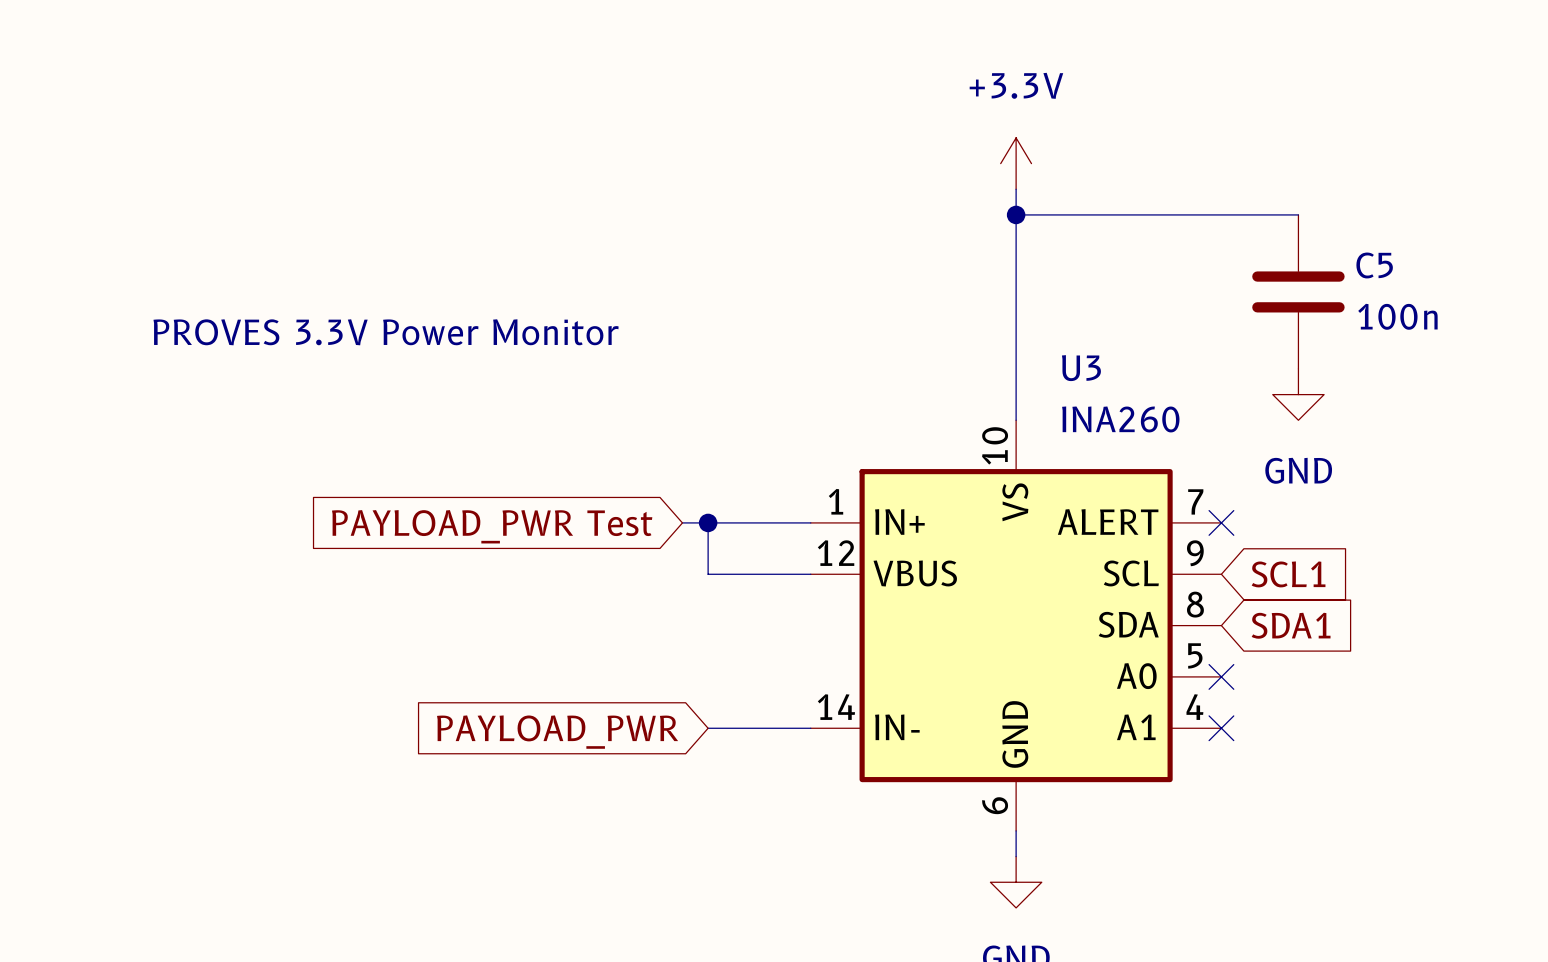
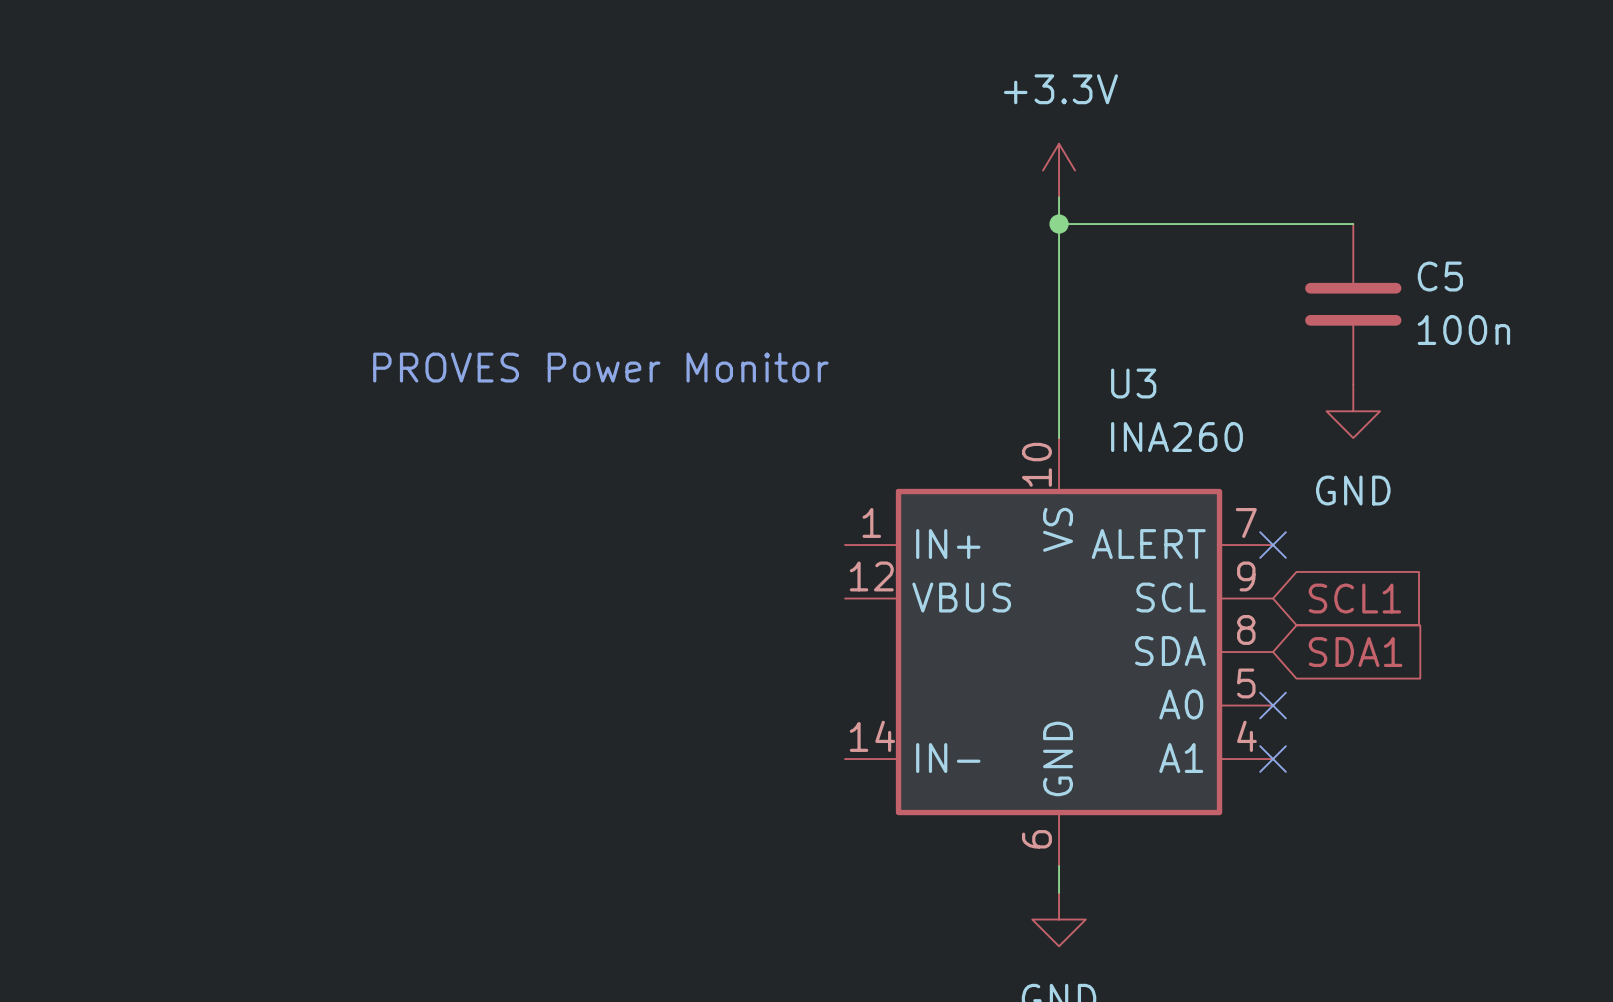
text: PROVES 3.3V Power Monitor (386, 332) -> PROVES Power Monitor (600, 367)
wire: (682, 522) (810, 522) -> none
wire: (708, 522) (708, 574) (810, 574) -> none
junction: (708, 522) -> none
global label: PAYLOAD_PWR Test (492, 526) -> none
wire: (708, 728) (810, 728) -> none
global label: PAYLOAD_PWR (557, 732) -> none

